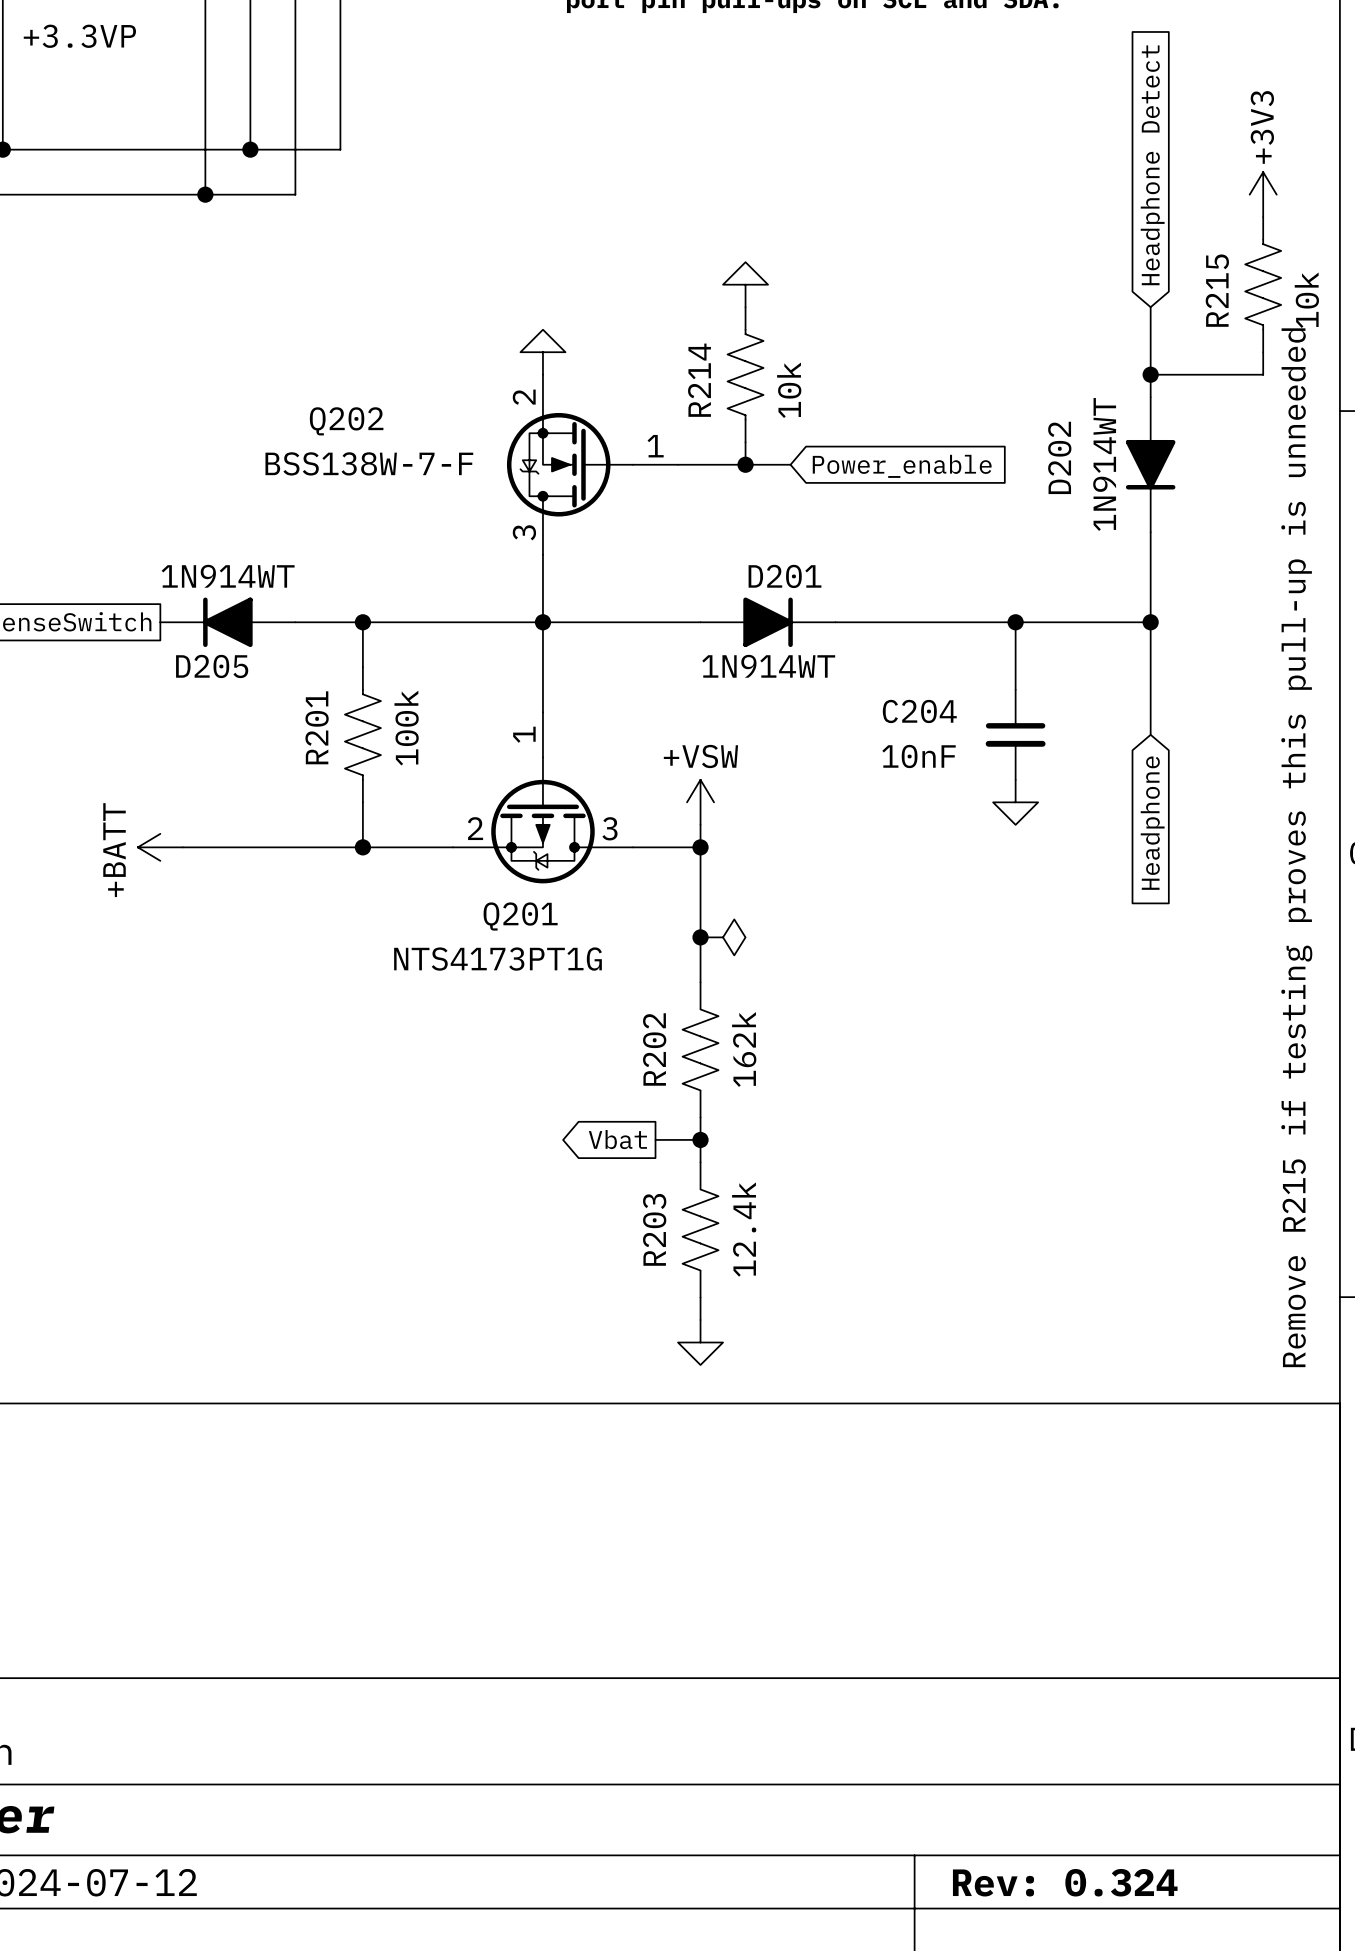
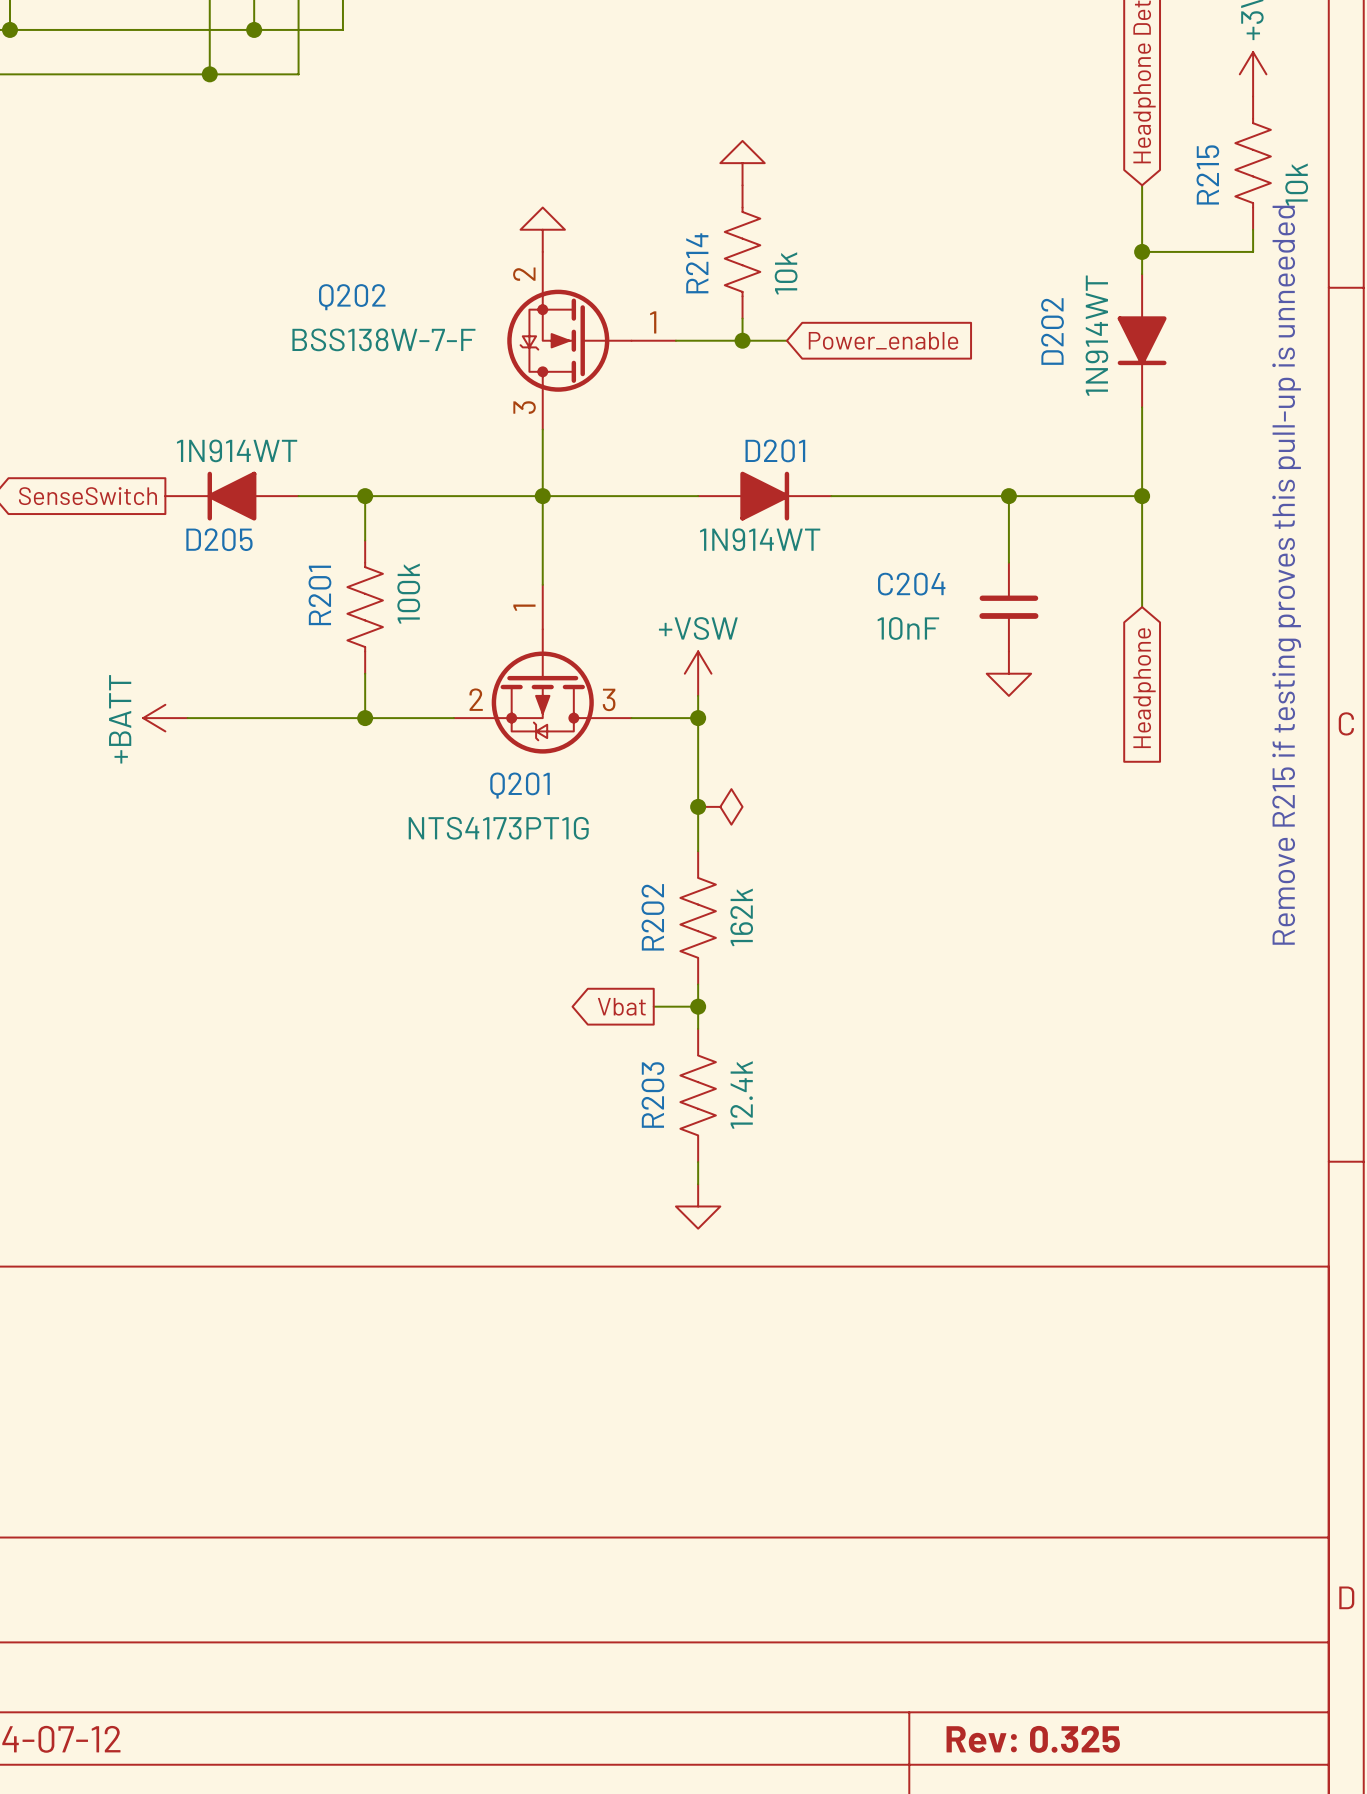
title block: Rev: 0.324 (1065, 1882) -> Rev: 0.325 (1033, 1739)

